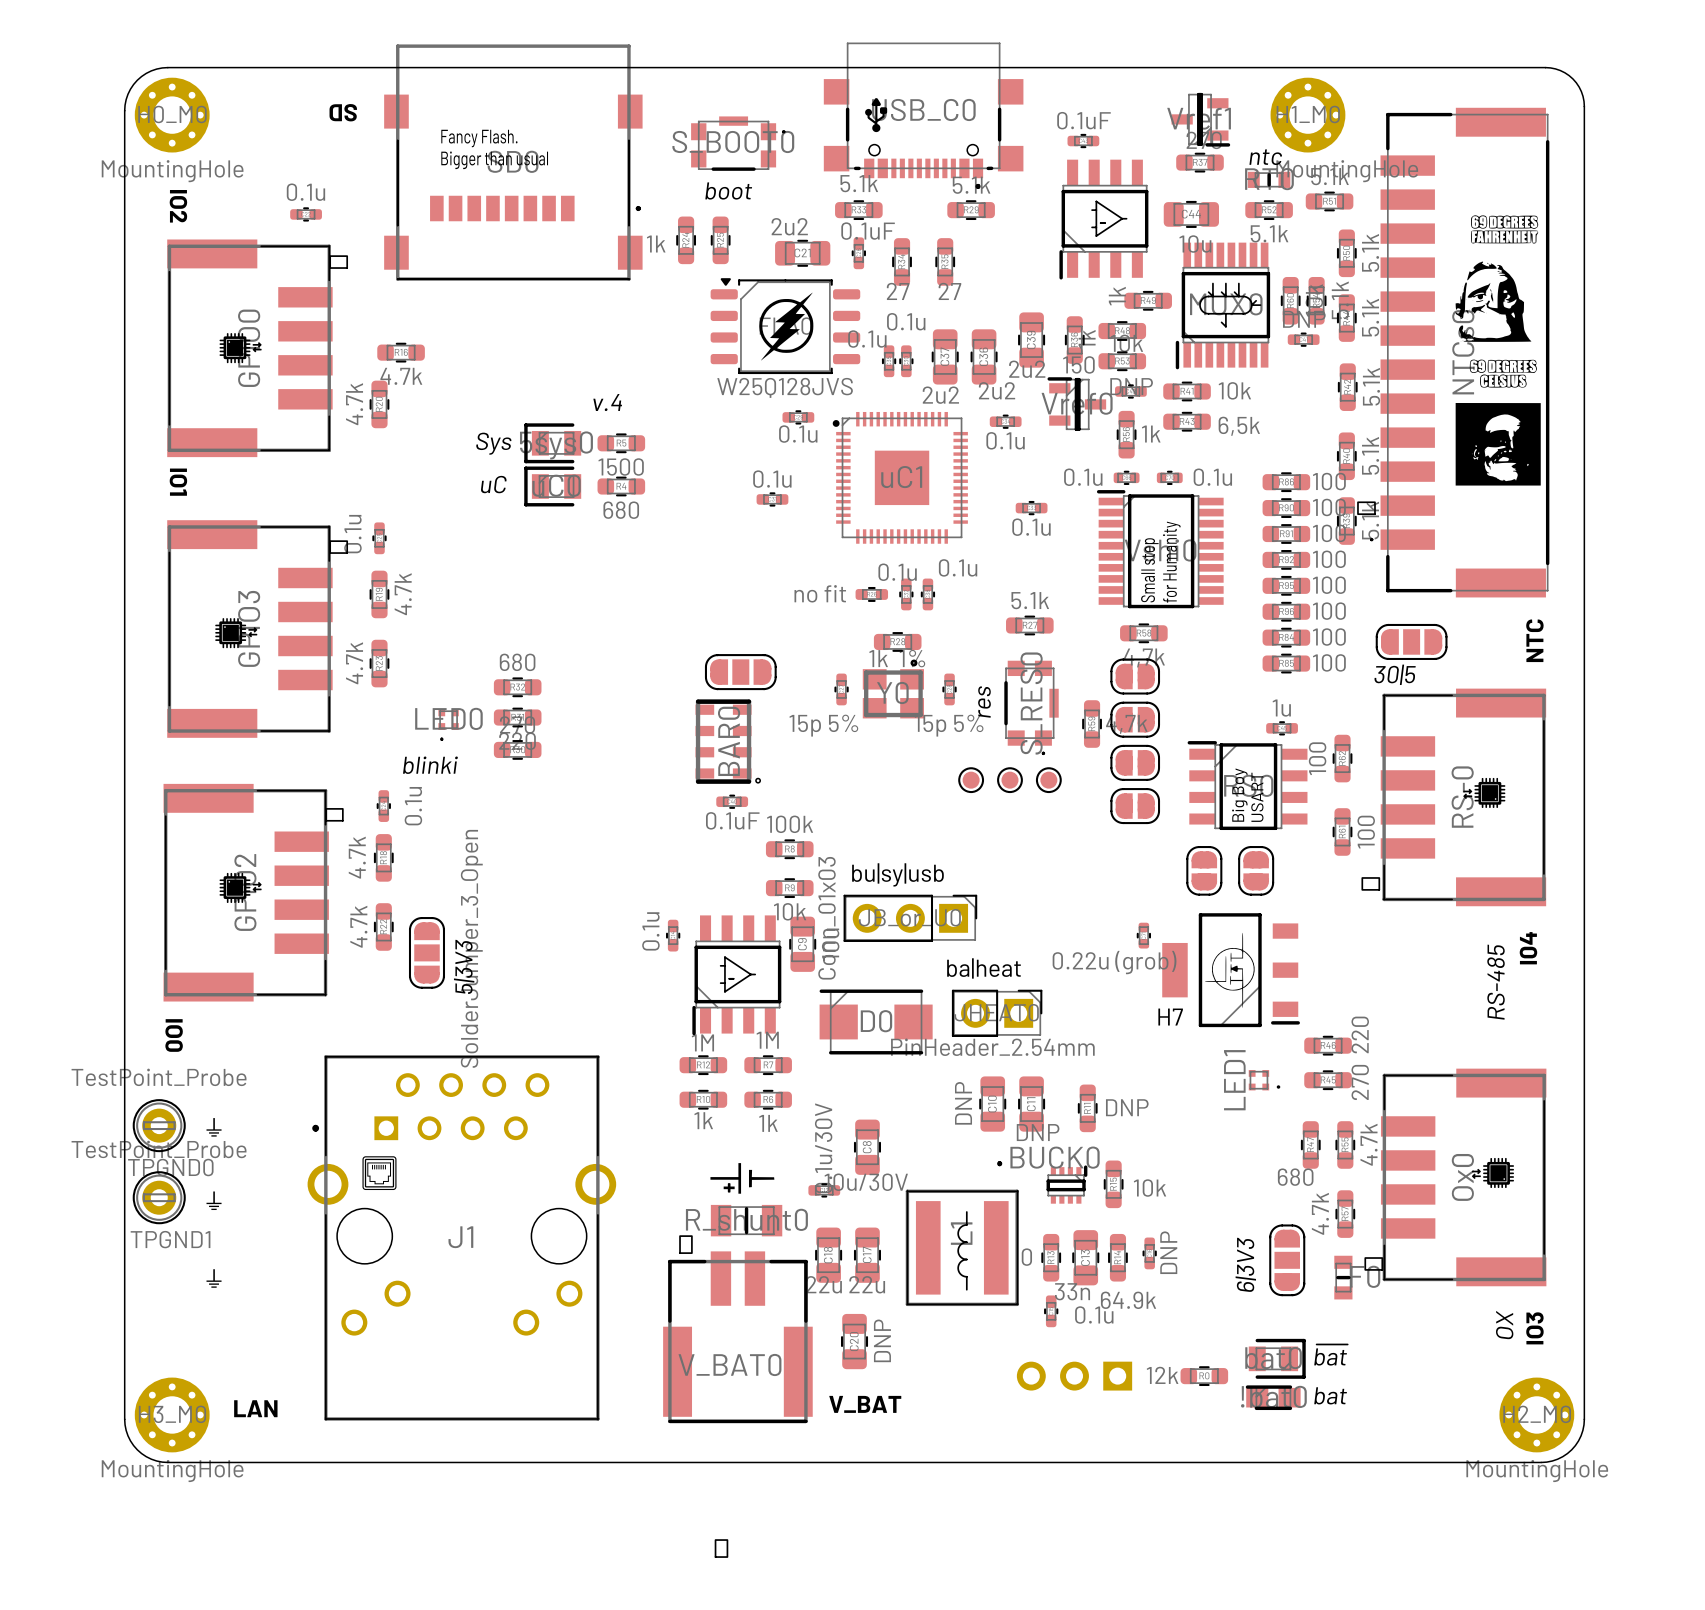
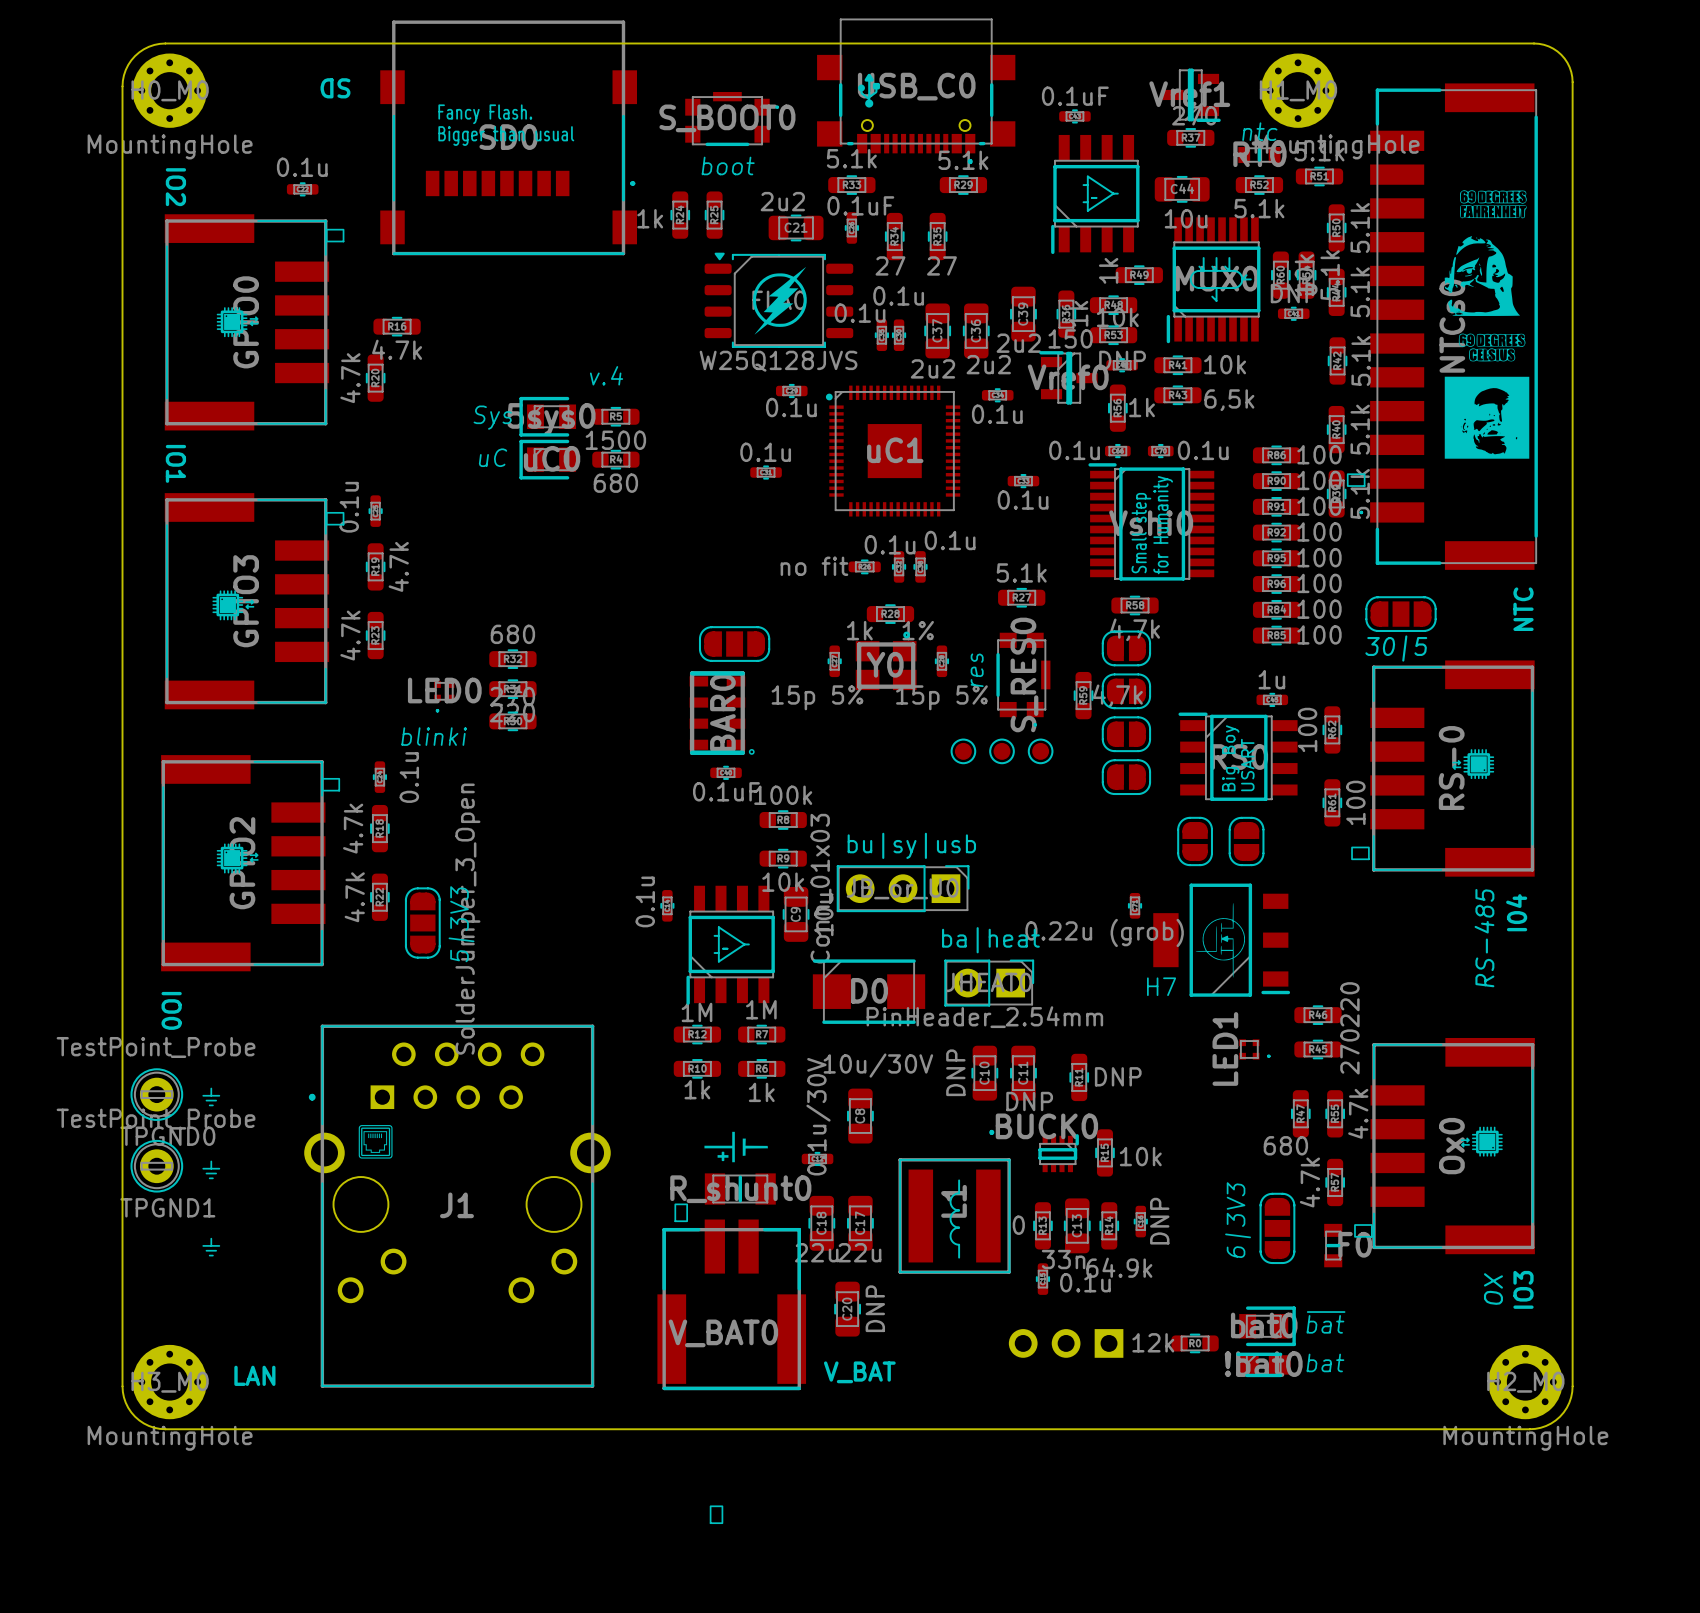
C8 value position: 10u/30V (866, 1182) -> 10u/30V (878, 1065)

